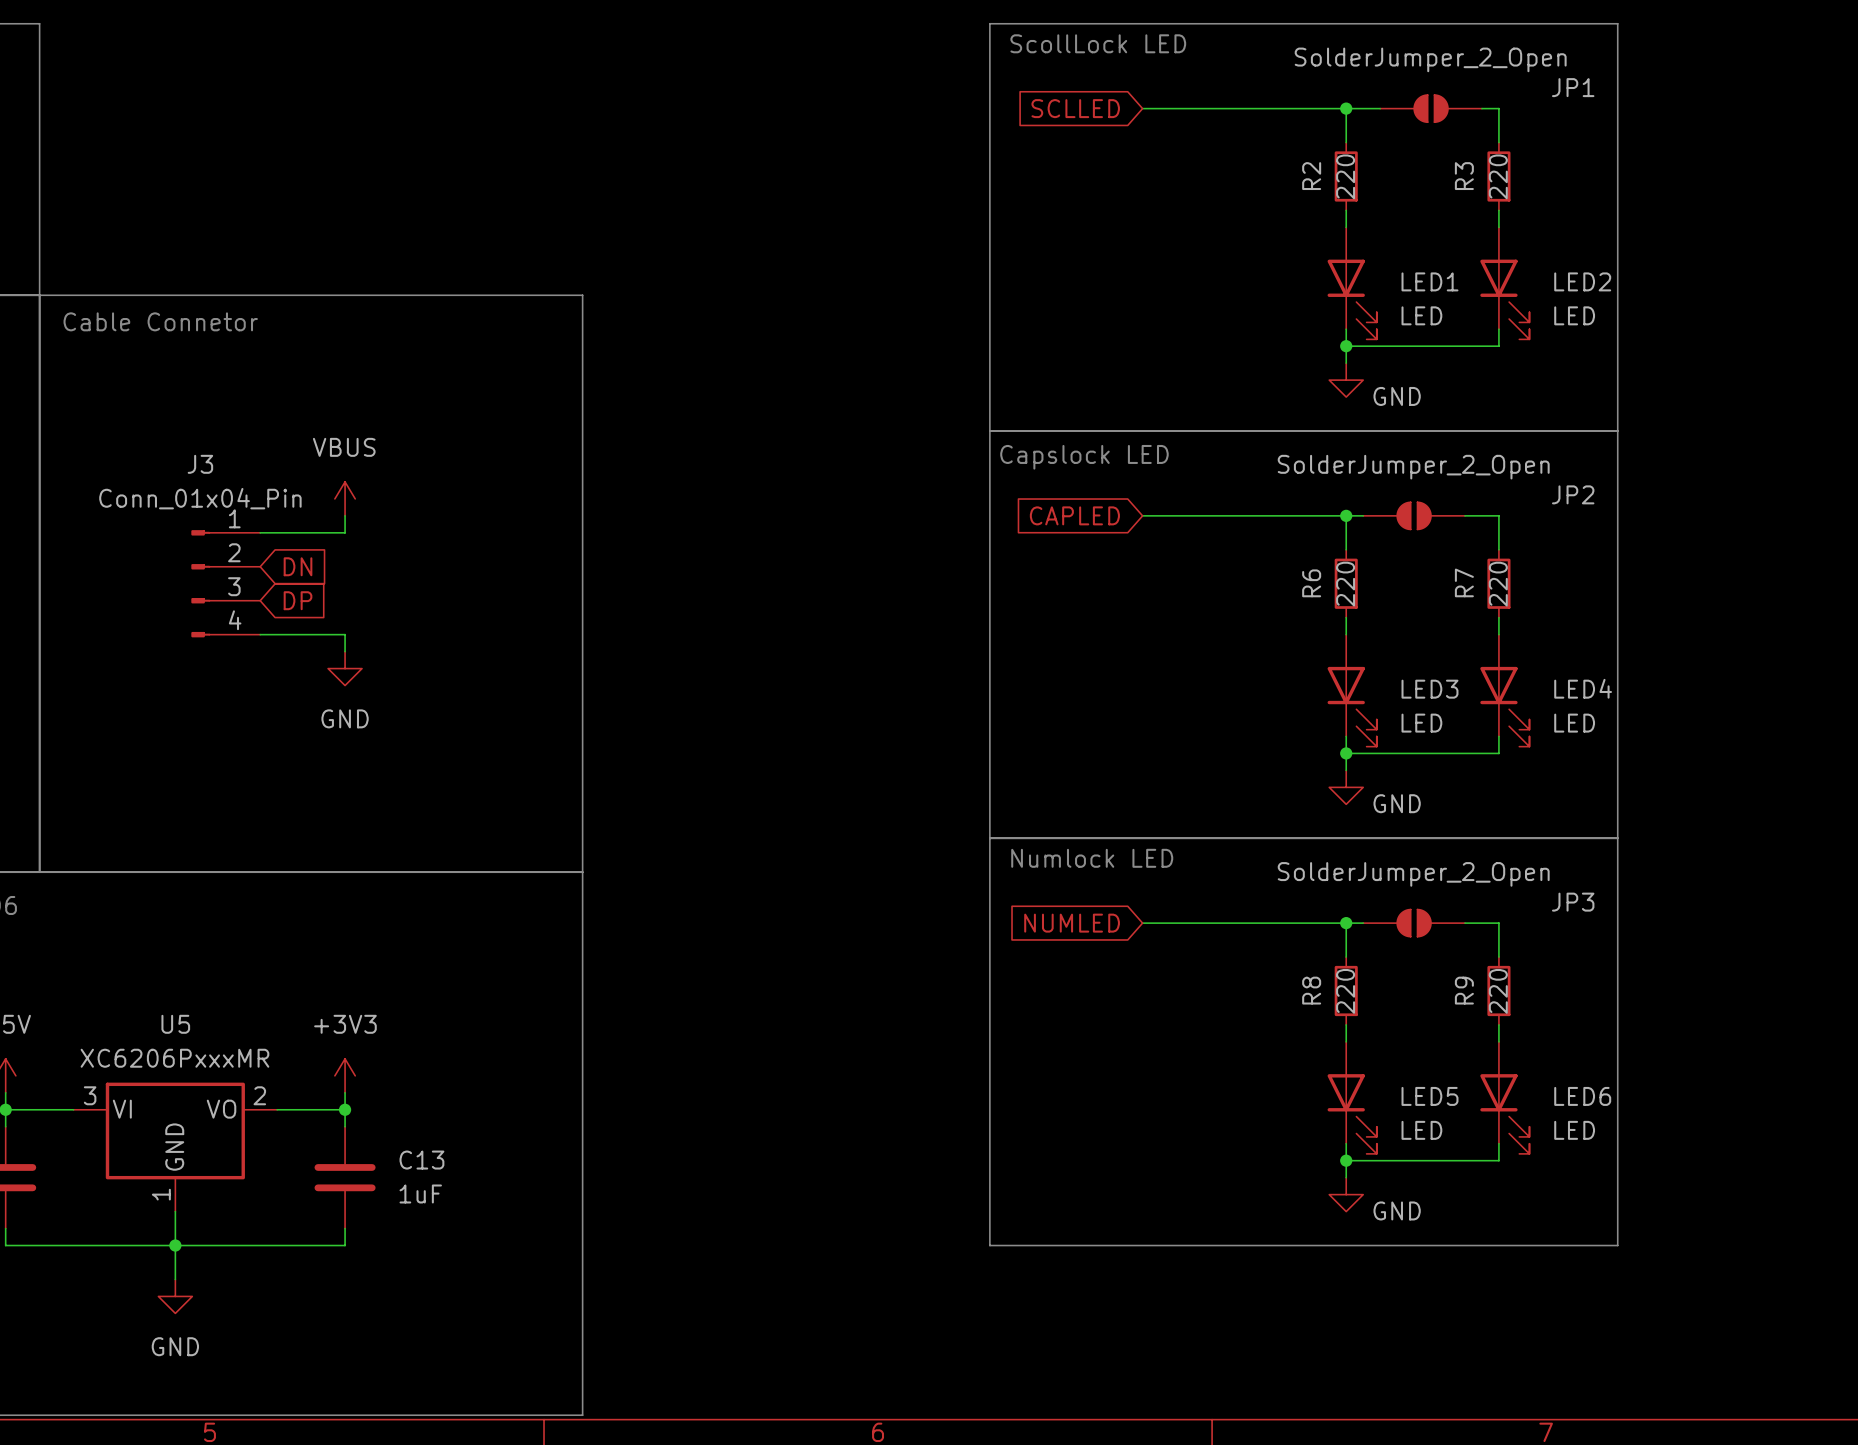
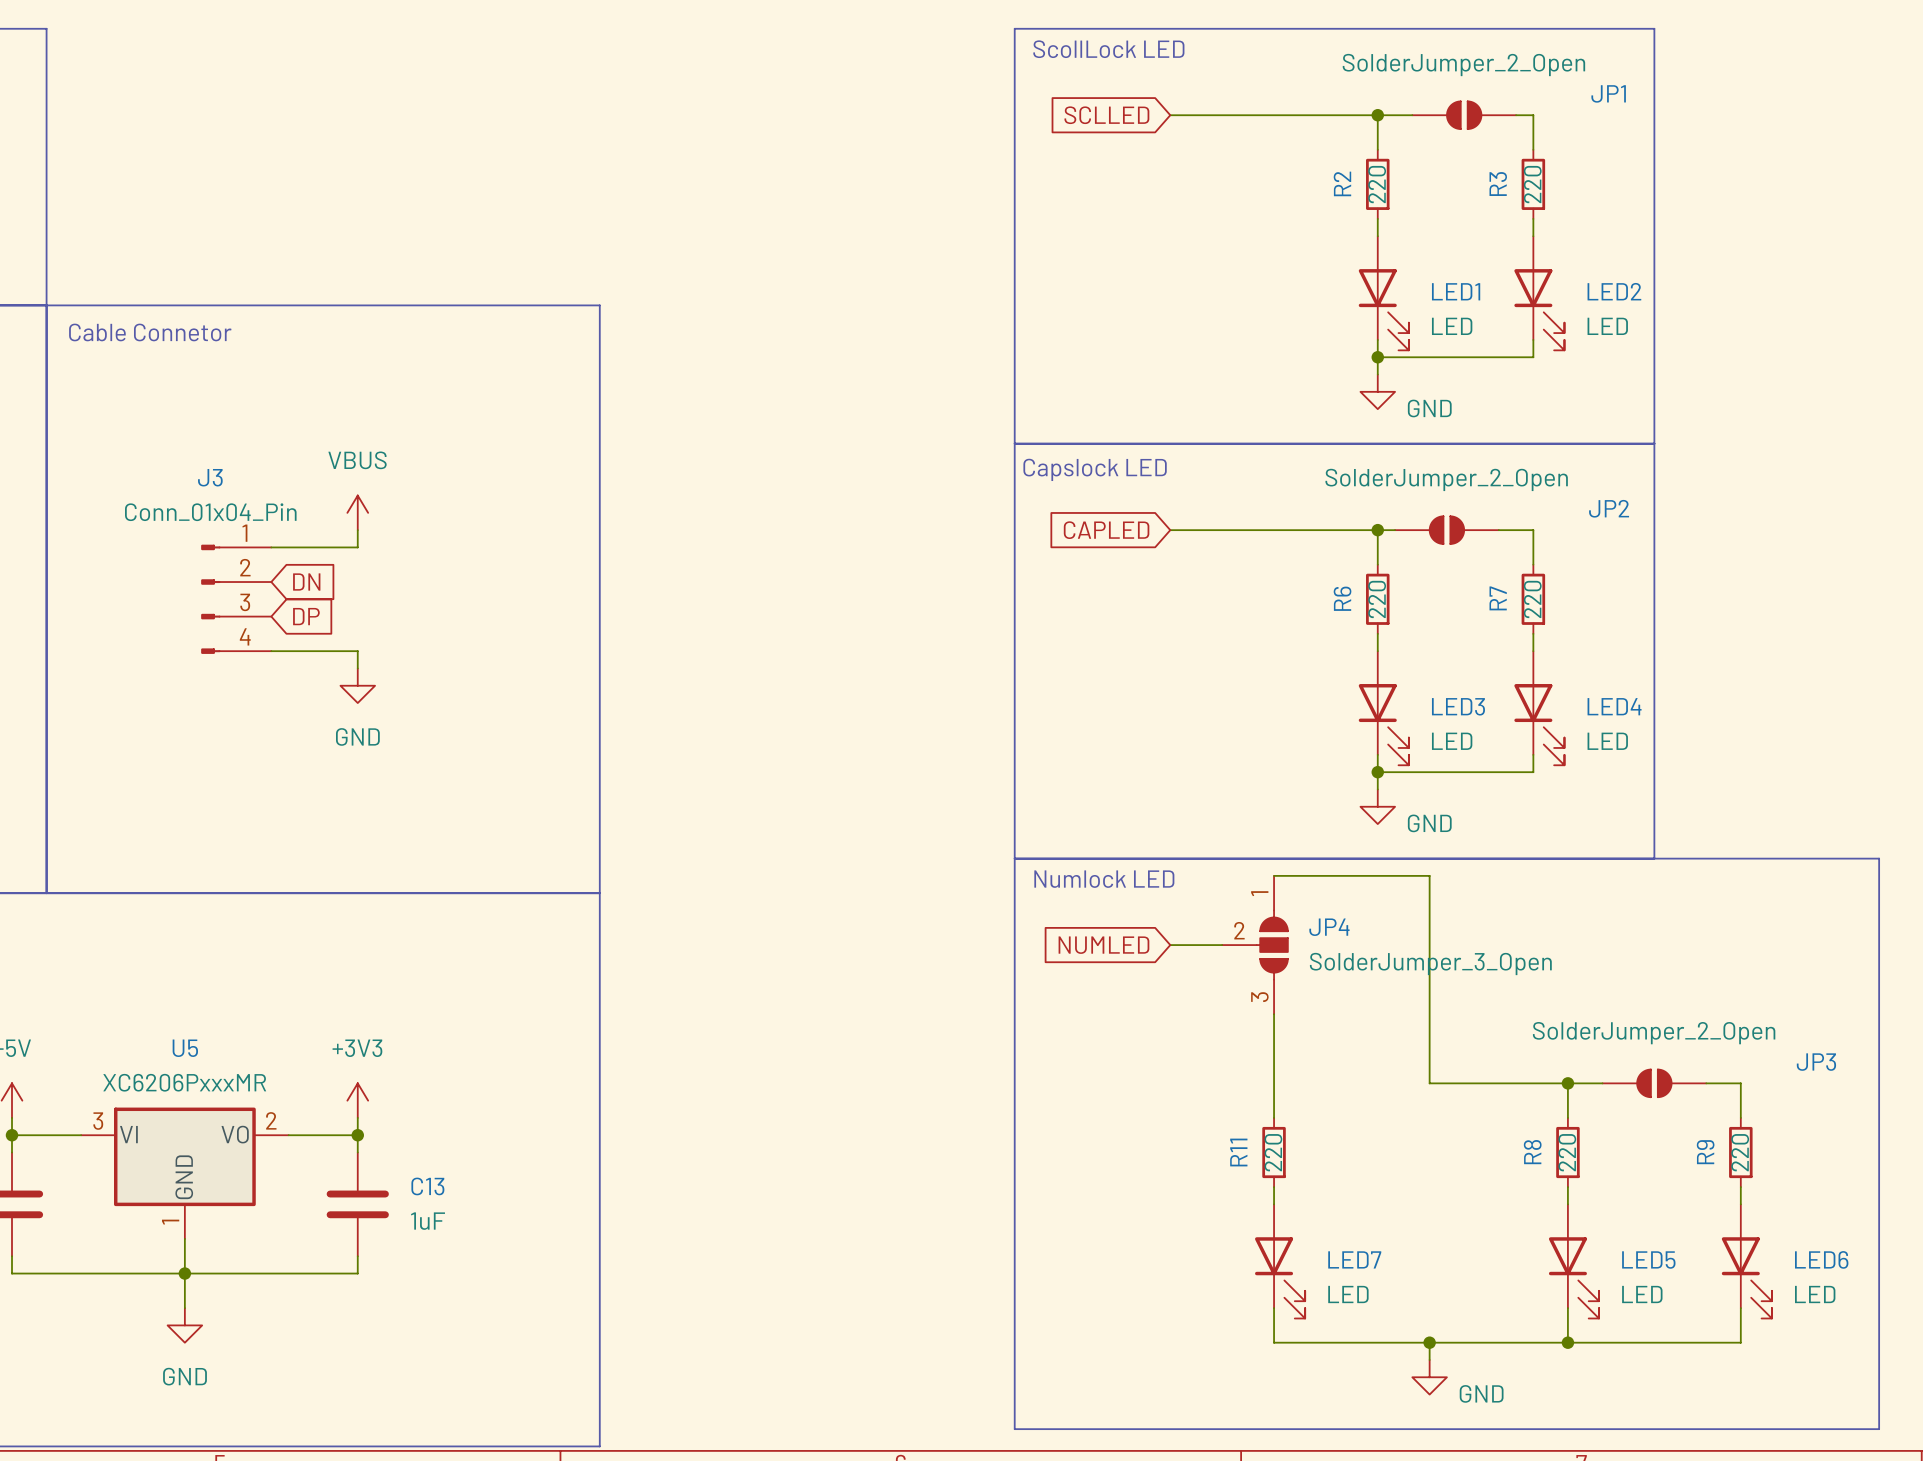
line: (1617, 838) (1617, 1245) (989, 1245) -> (1654, 858) (1879, 858) (1879, 1429) (1014, 1429) (1014, 1273)
wire: none -> (1274, 875) (1429, 875) (1429, 1083) (1602, 1083)
wire: (1193, 923) (1363, 923) -> none
JP4: none -> SolderJumper_3_Open (1255, 945)
wire: (1346, 923) (1346, 957) -> (1567, 1083) (1567, 1117)
junction: (1346, 923) -> none
JP3 position: (1414, 923) -> (1654, 1083)
wire: (1465, 923) (1498, 923) (1498, 957) -> (1706, 1083) (1740, 1083) (1740, 1117)
wire: none -> (1274, 1014) (1274, 1117)
R8 position: (1346, 990) -> (1567, 1152)
R9 position: (1498, 990) -> (1740, 1152)
wire: (1346, 1024) (1346, 1041) -> (1567, 1187) (1567, 1204)
wire: (1498, 1024) (1498, 1041) -> (1740, 1187) (1740, 1204)
junction: none -> (1567, 1083)
LED5 position: (1352, 1097) -> (1573, 1261)
LED6 position: (1504, 1097) -> (1746, 1261)
R11: none -> 220 (1274, 1152)
wire: (1346, 1143) (1346, 1177) -> (1567, 1308) (1567, 1342)
wire: (1498, 1143) (1498, 1160) (1346, 1160) -> none
wire: none -> (1274, 1187) (1274, 1204)
junction: (1346, 1160) -> none
power symbol position: GND (1346, 1194) -> GND (1429, 1377)
LED7: none -> LED (1280, 1261)
wire: none -> (1274, 1308) (1274, 1342) (1740, 1342) (1740, 1308)
wire: none -> (1429, 1342) (1429, 1359)
junction: none -> (1429, 1342)
junction: none -> (1567, 1342)

